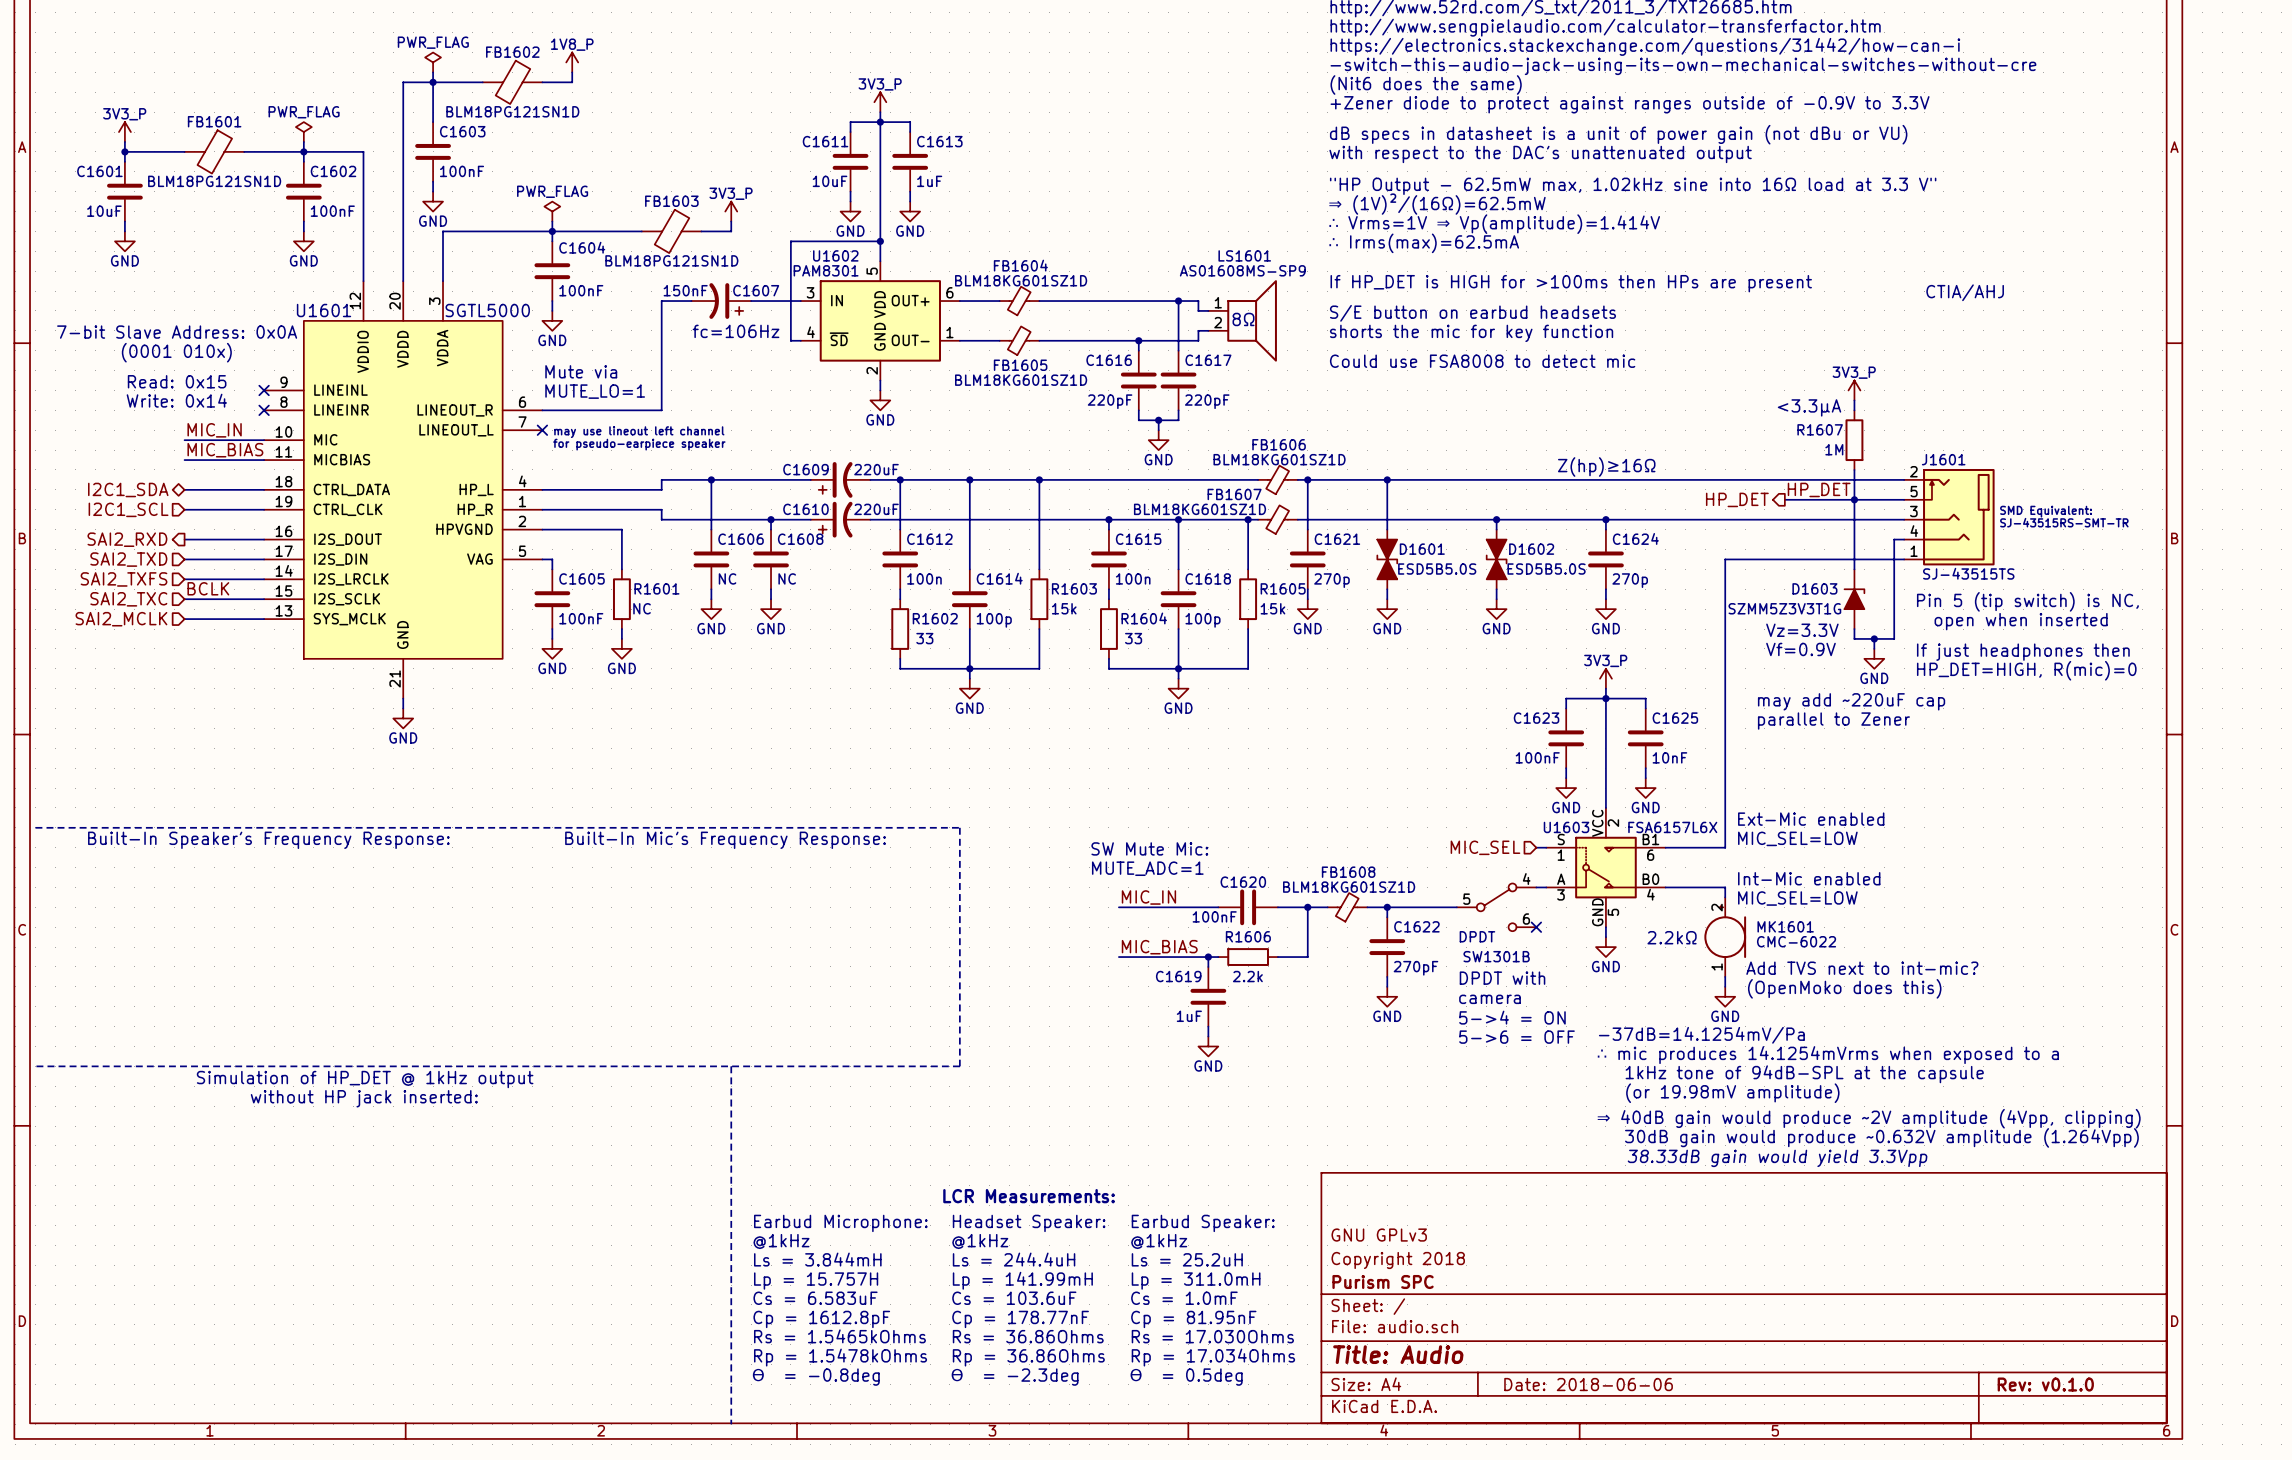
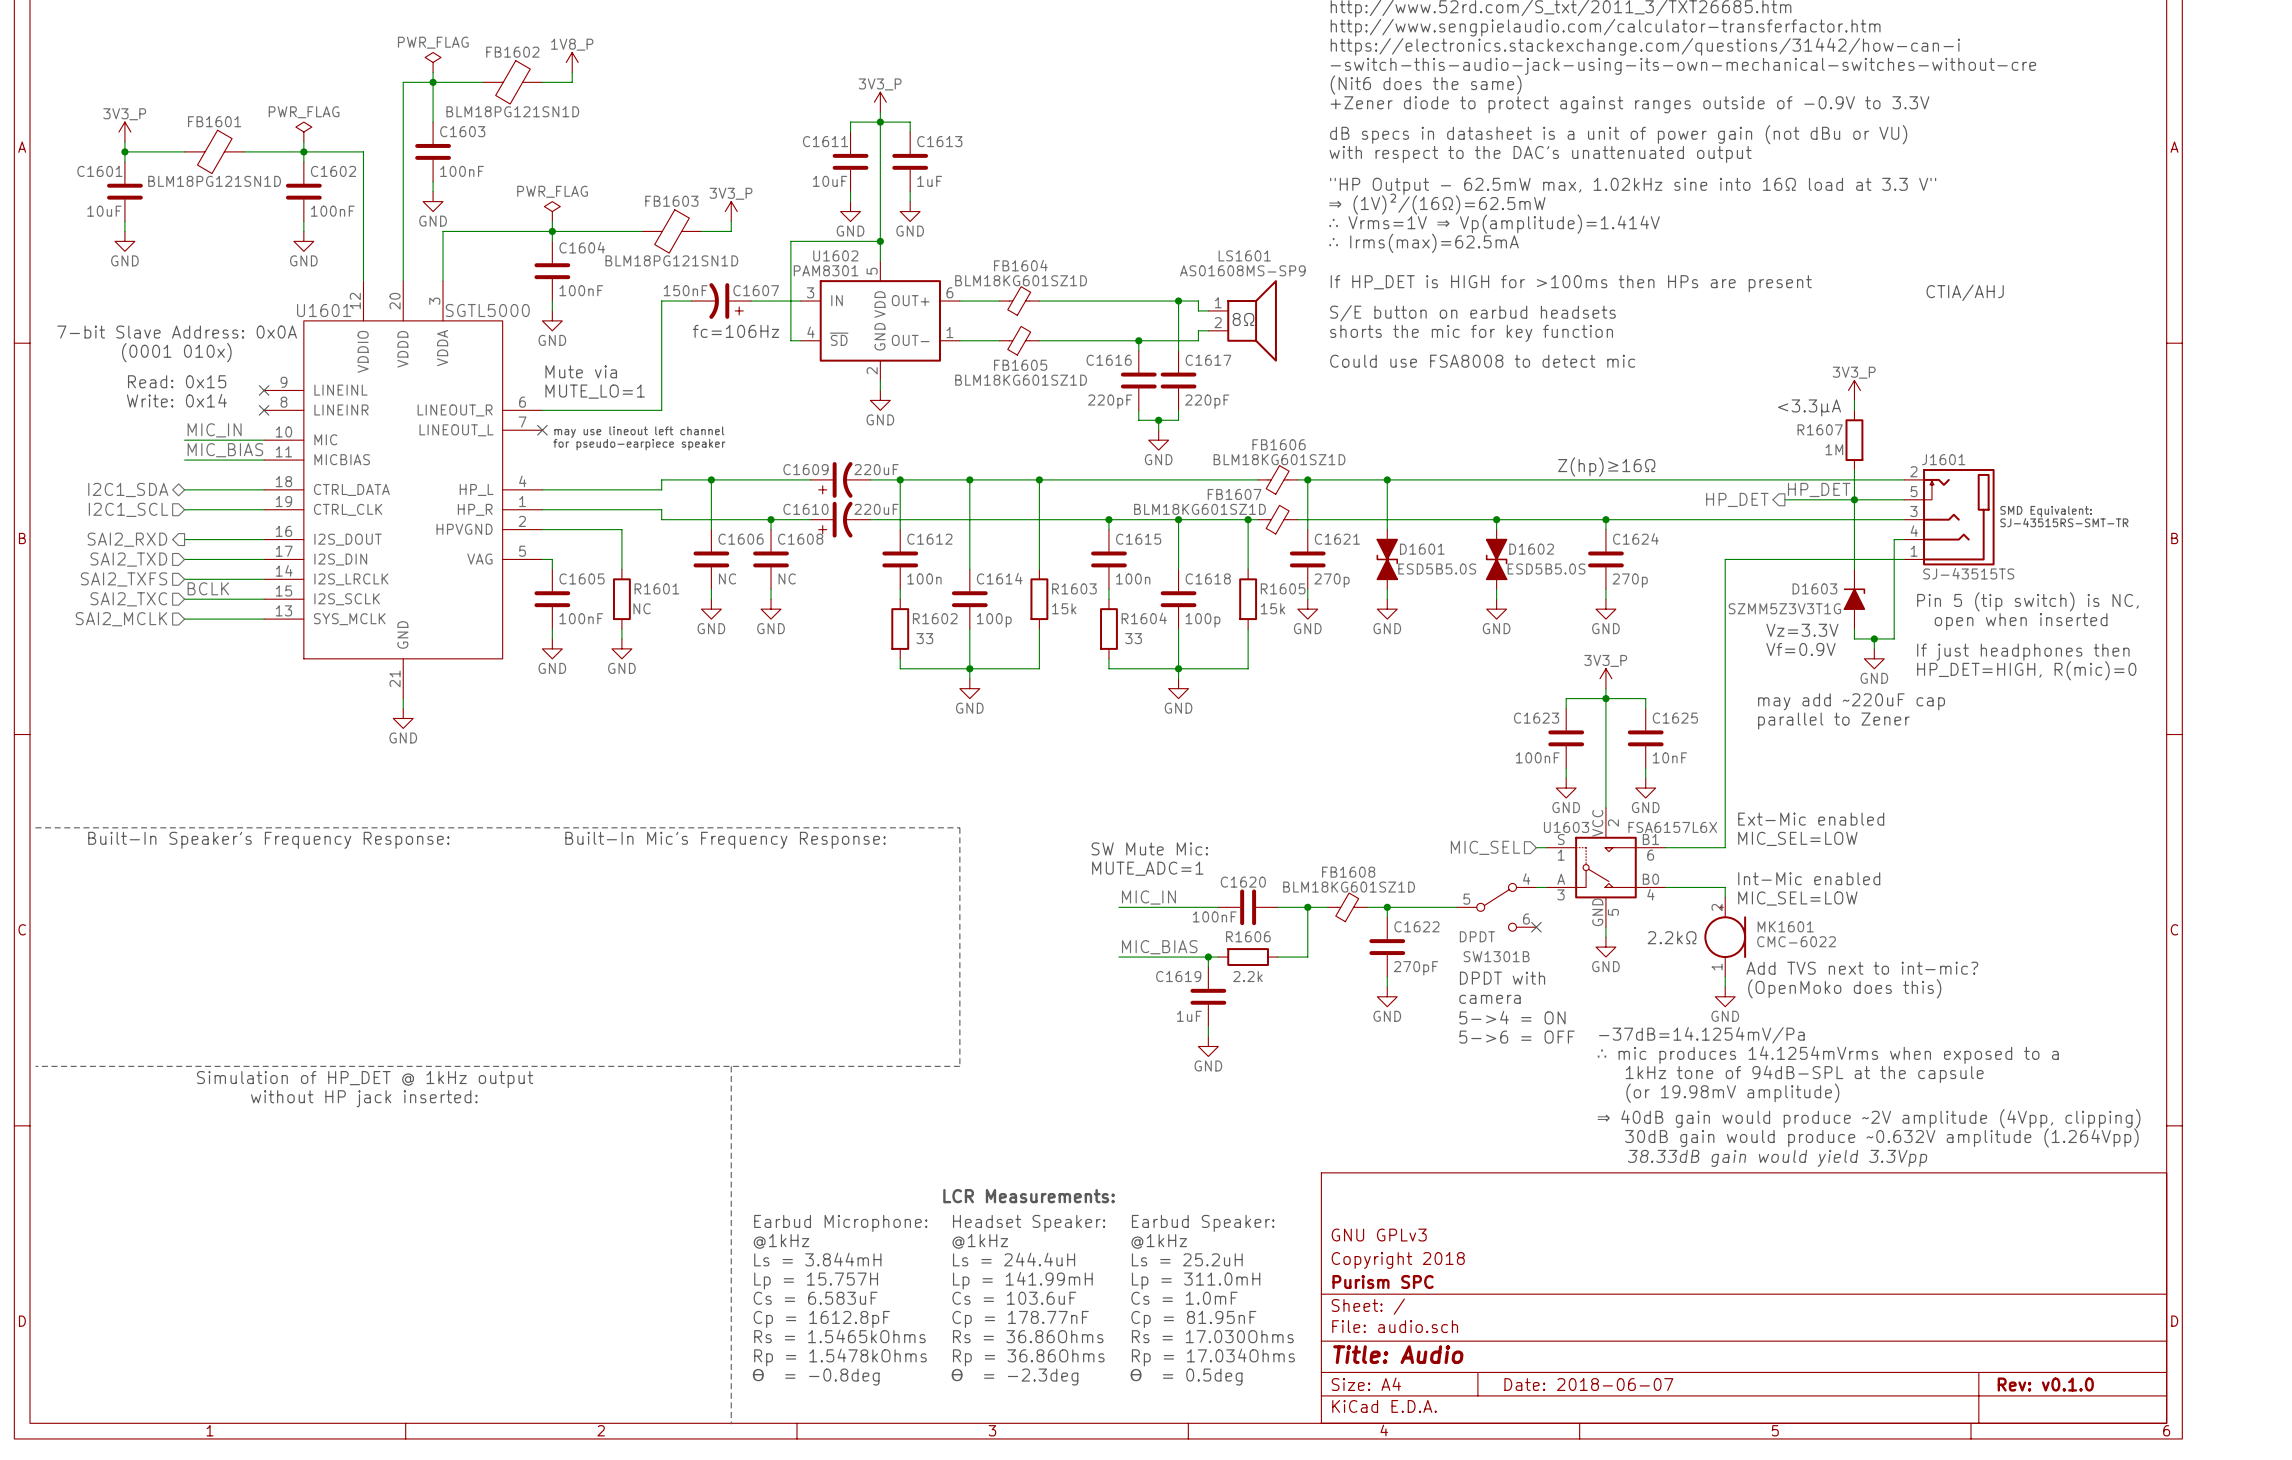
title block: Date: 2018-06-06 (1588, 1384) -> Date: 2018-06-07 (1588, 1384)

